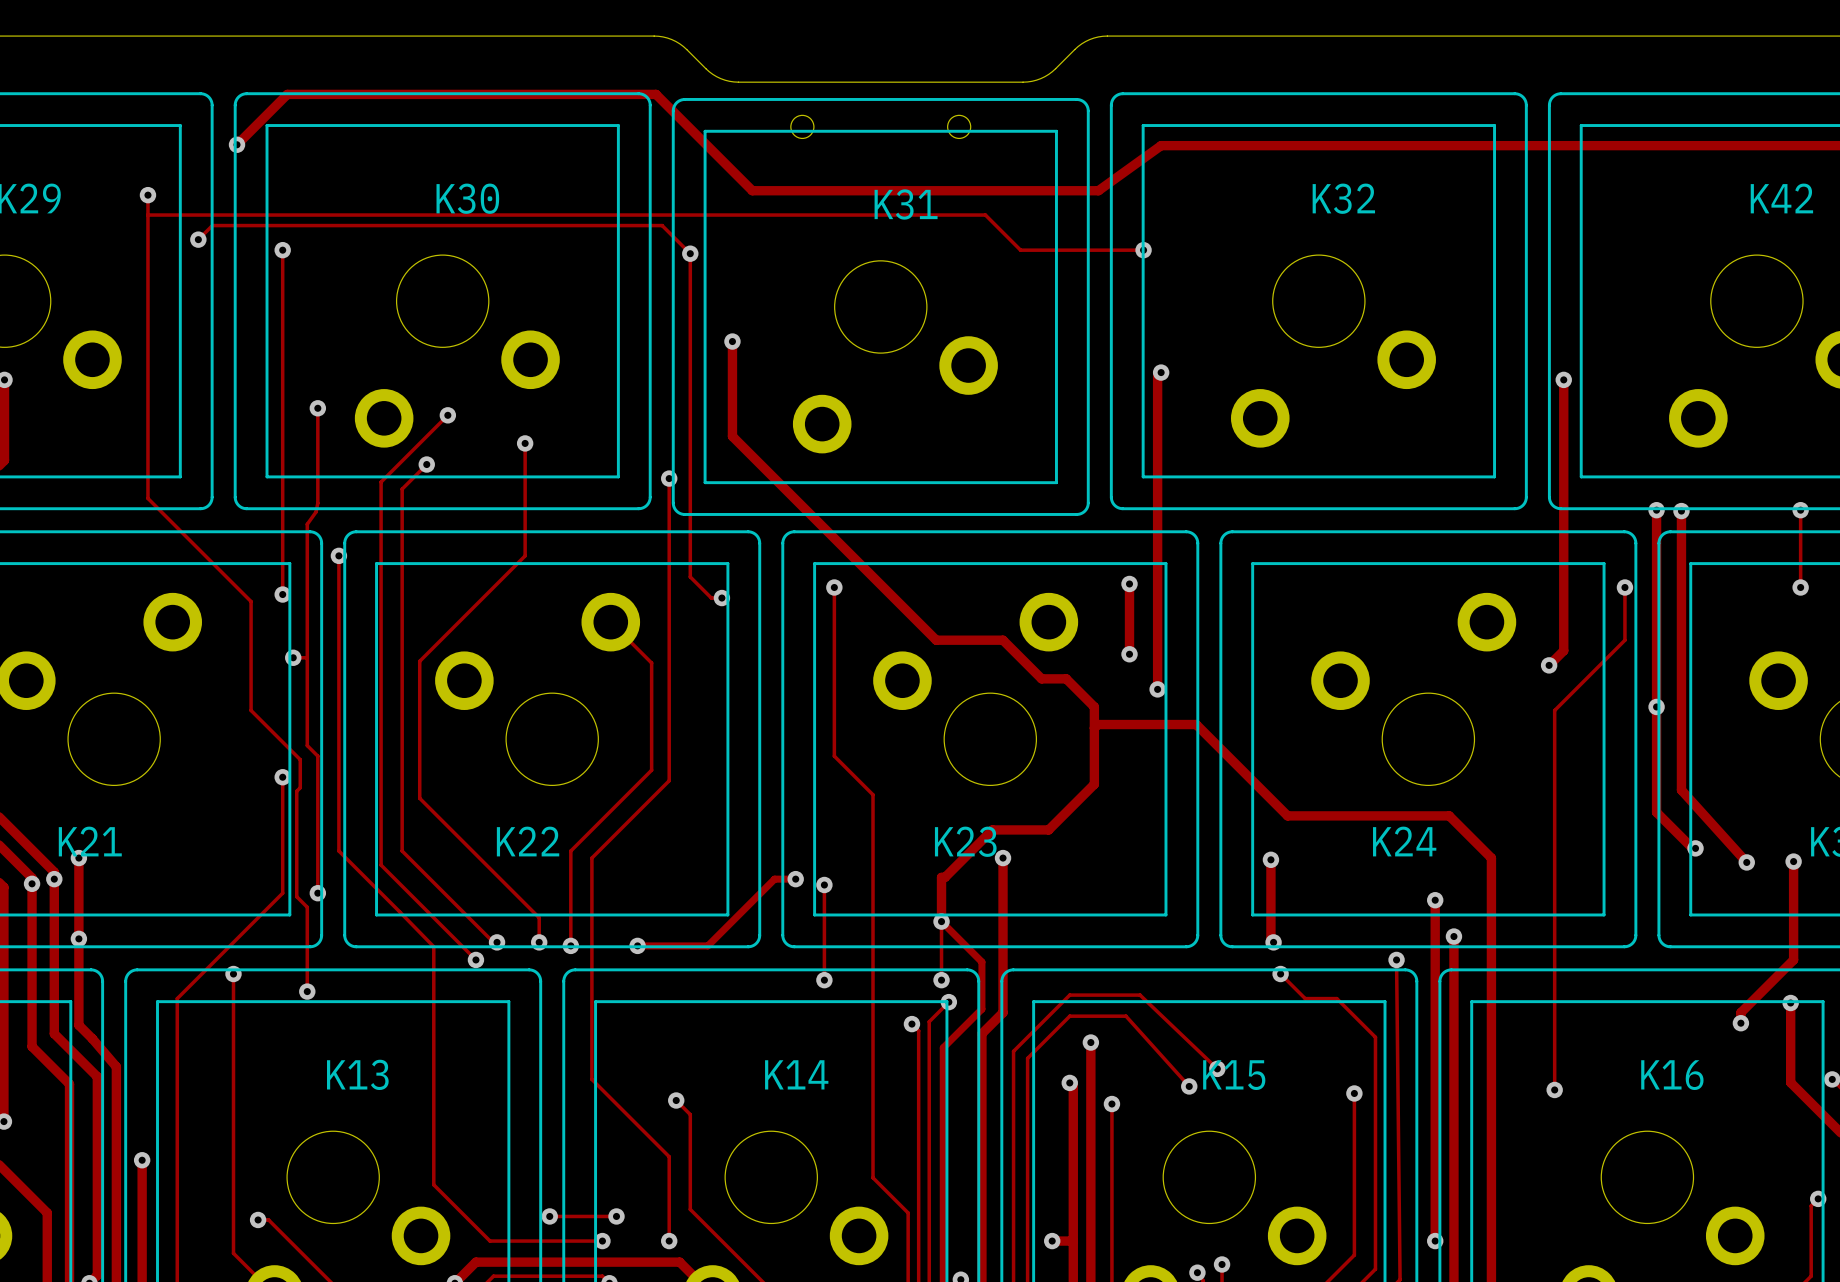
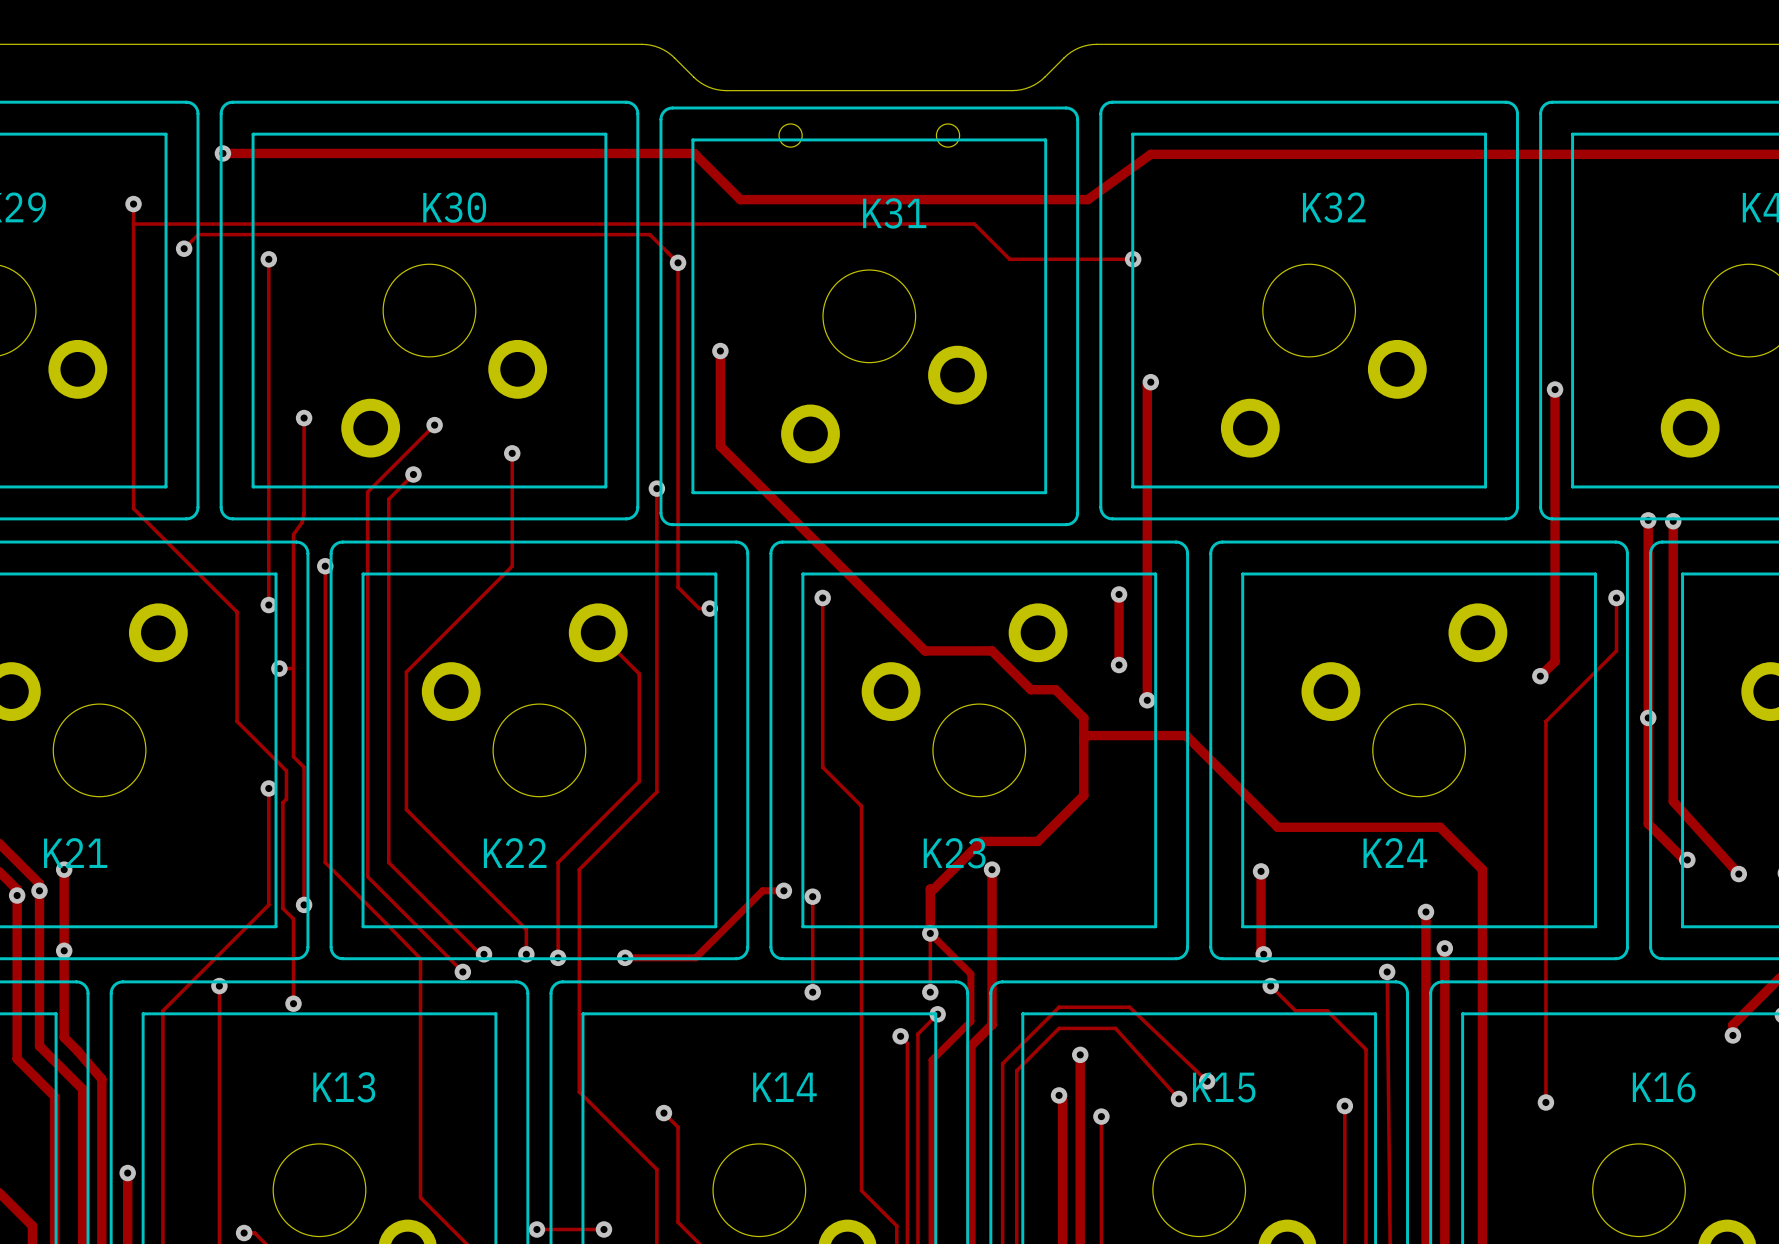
track: (237, 144) (287, 94) (656, 94) (706, 144) -> (222, 153) (694, 153)

